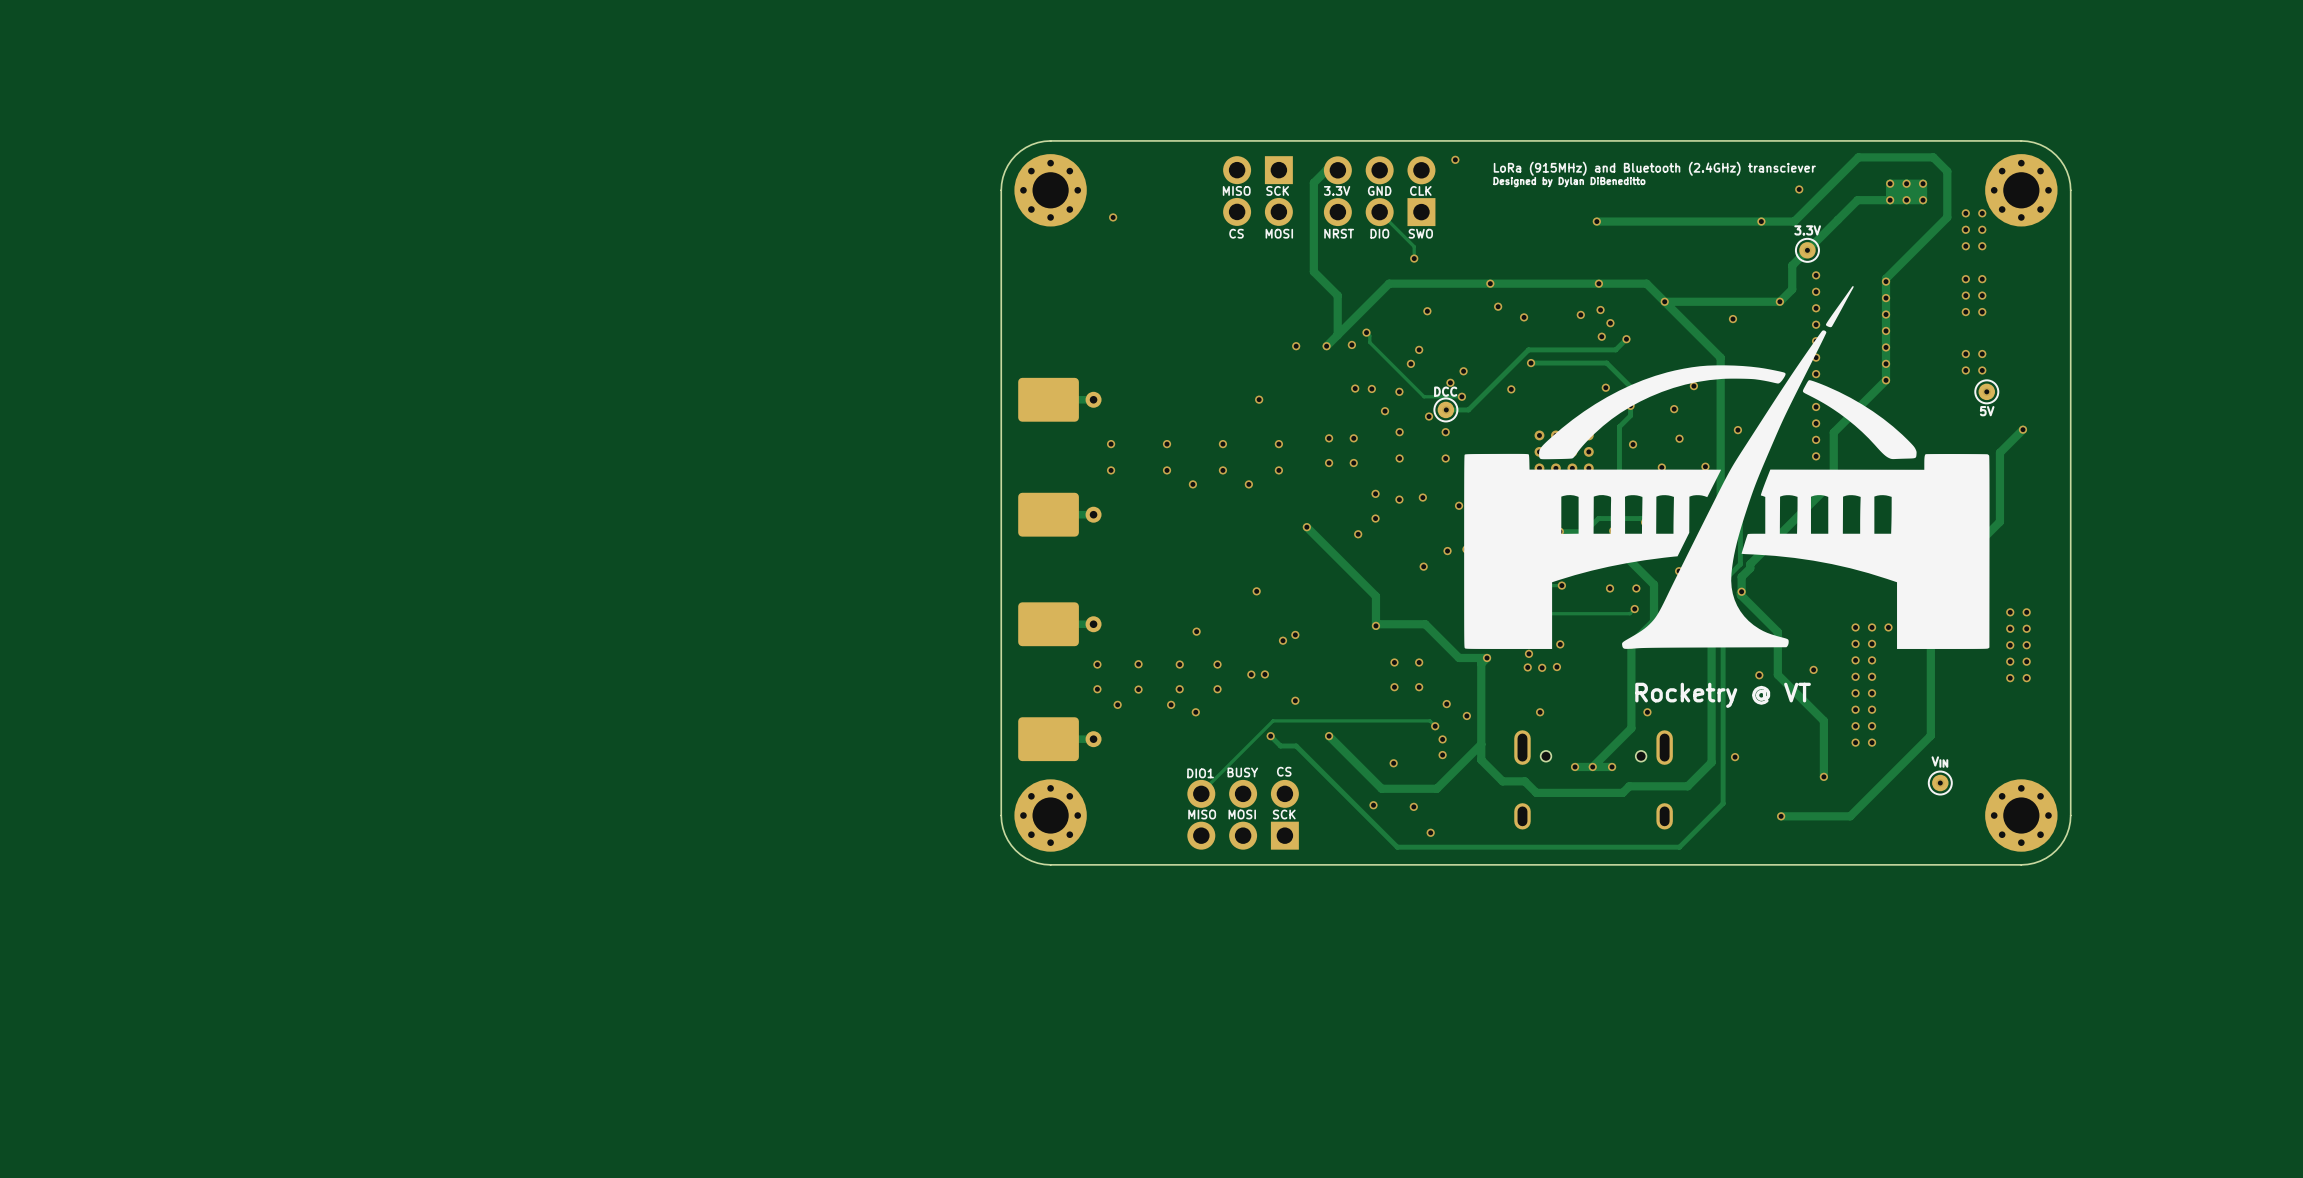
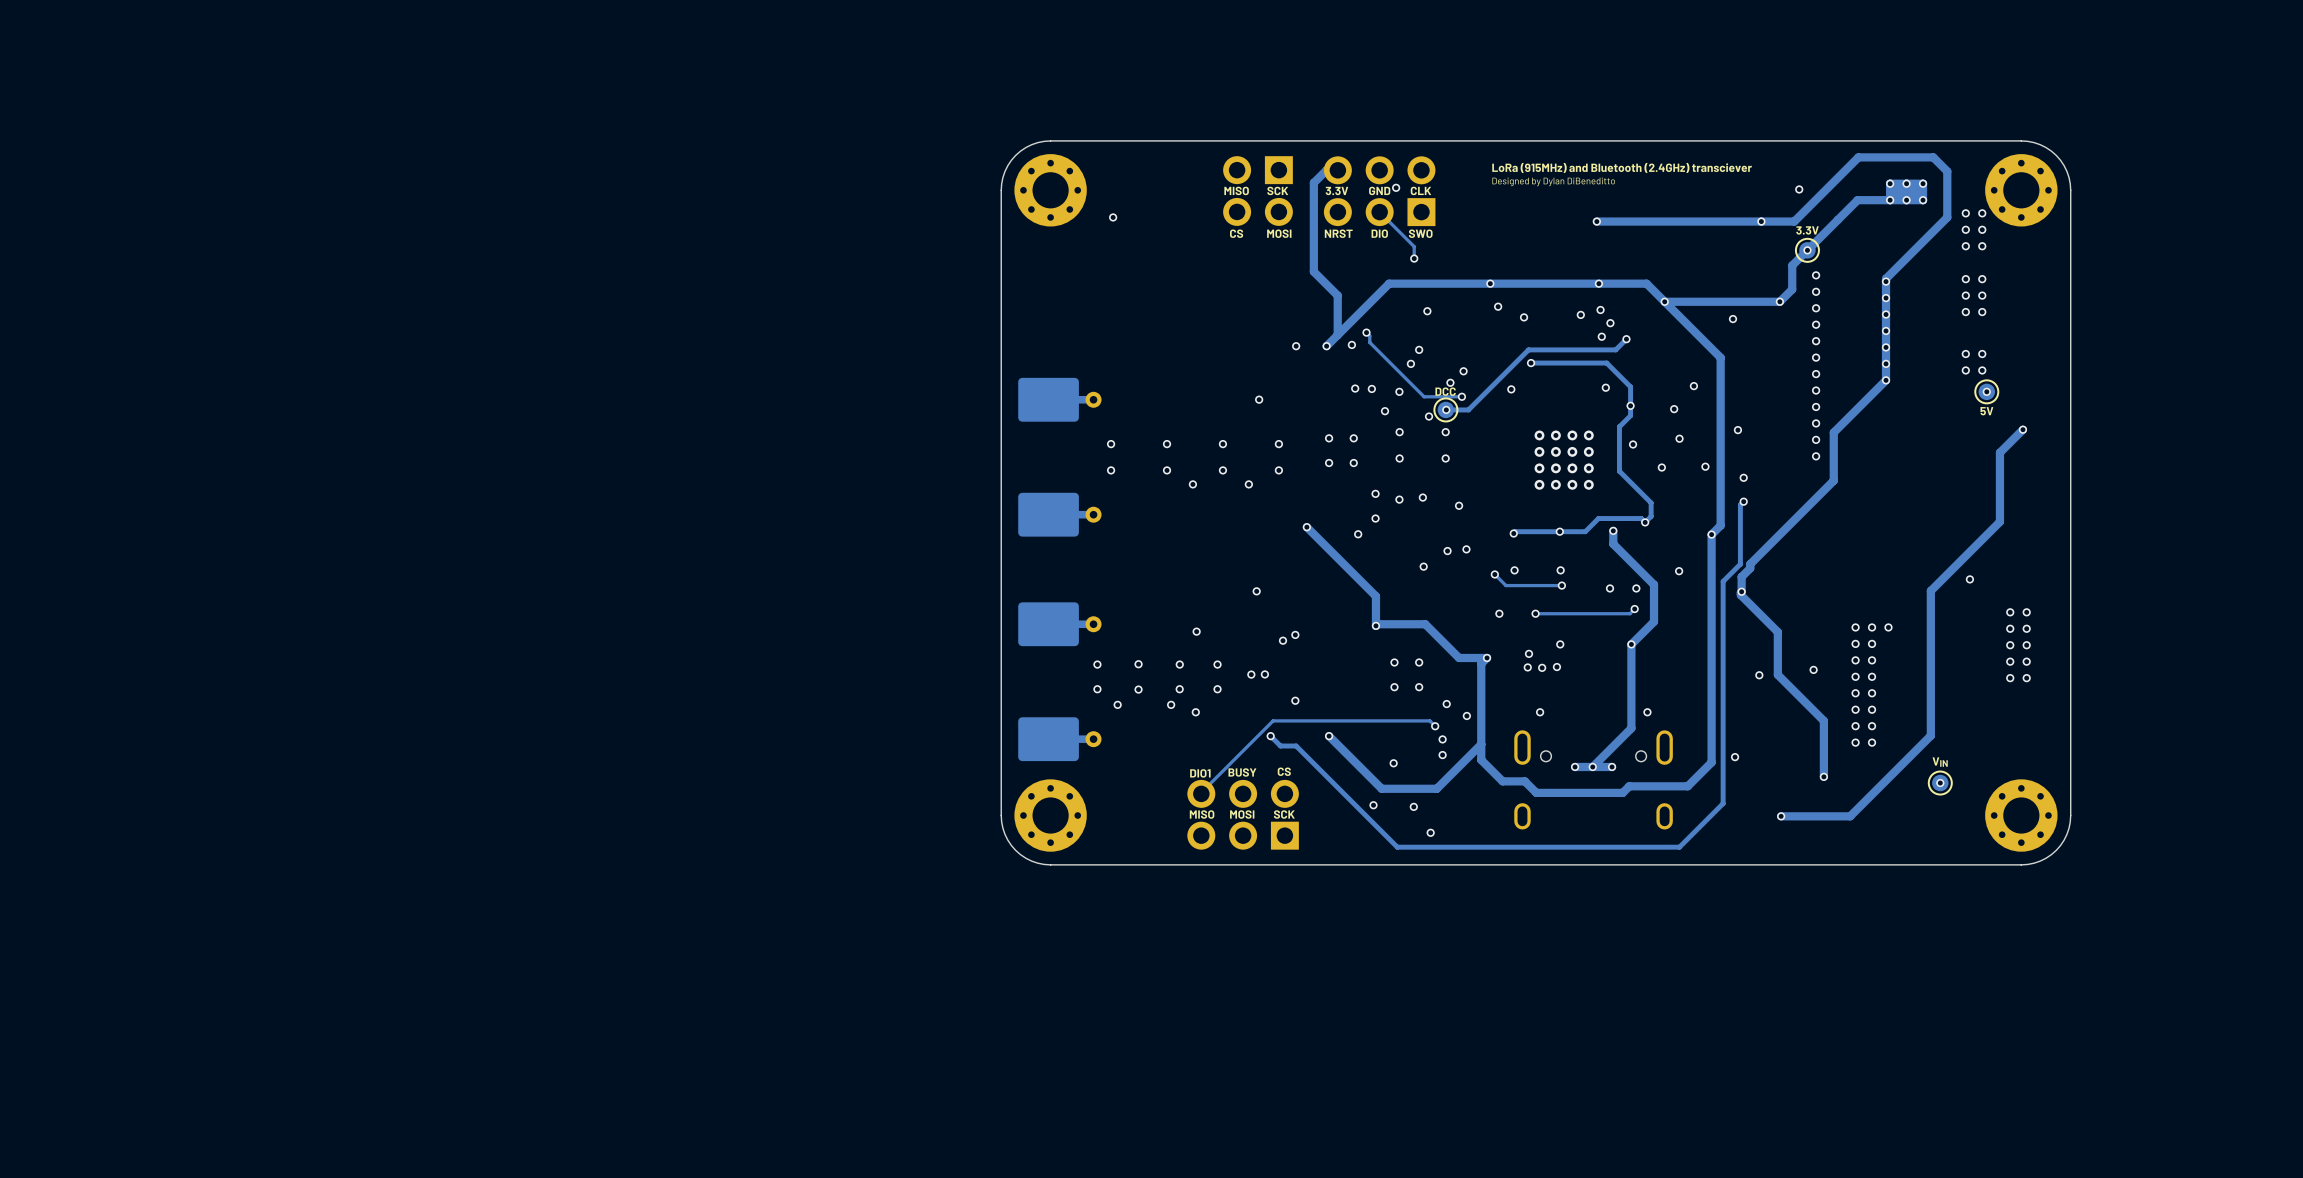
via position: (1455, 159) -> (1396, 187)
drawing: [1464, 286, 1990, 649] -> none
text: Rocketry @ VT (1723, 695) -> none

